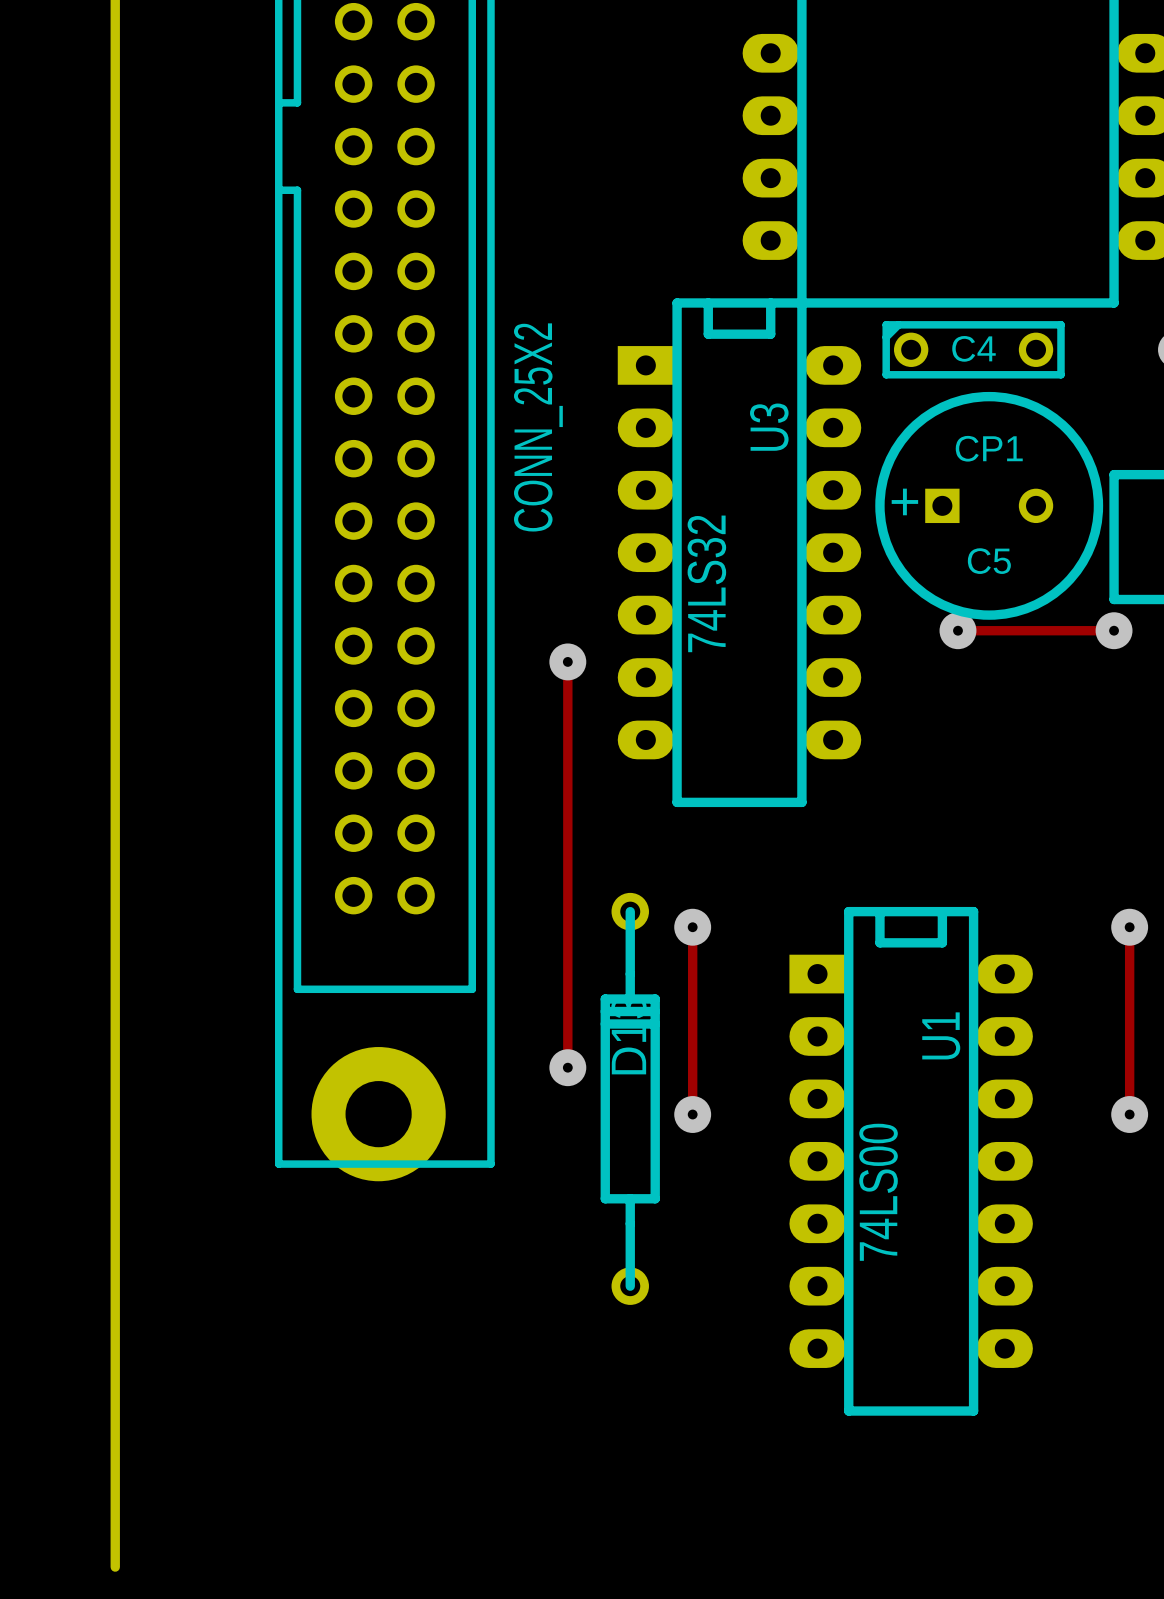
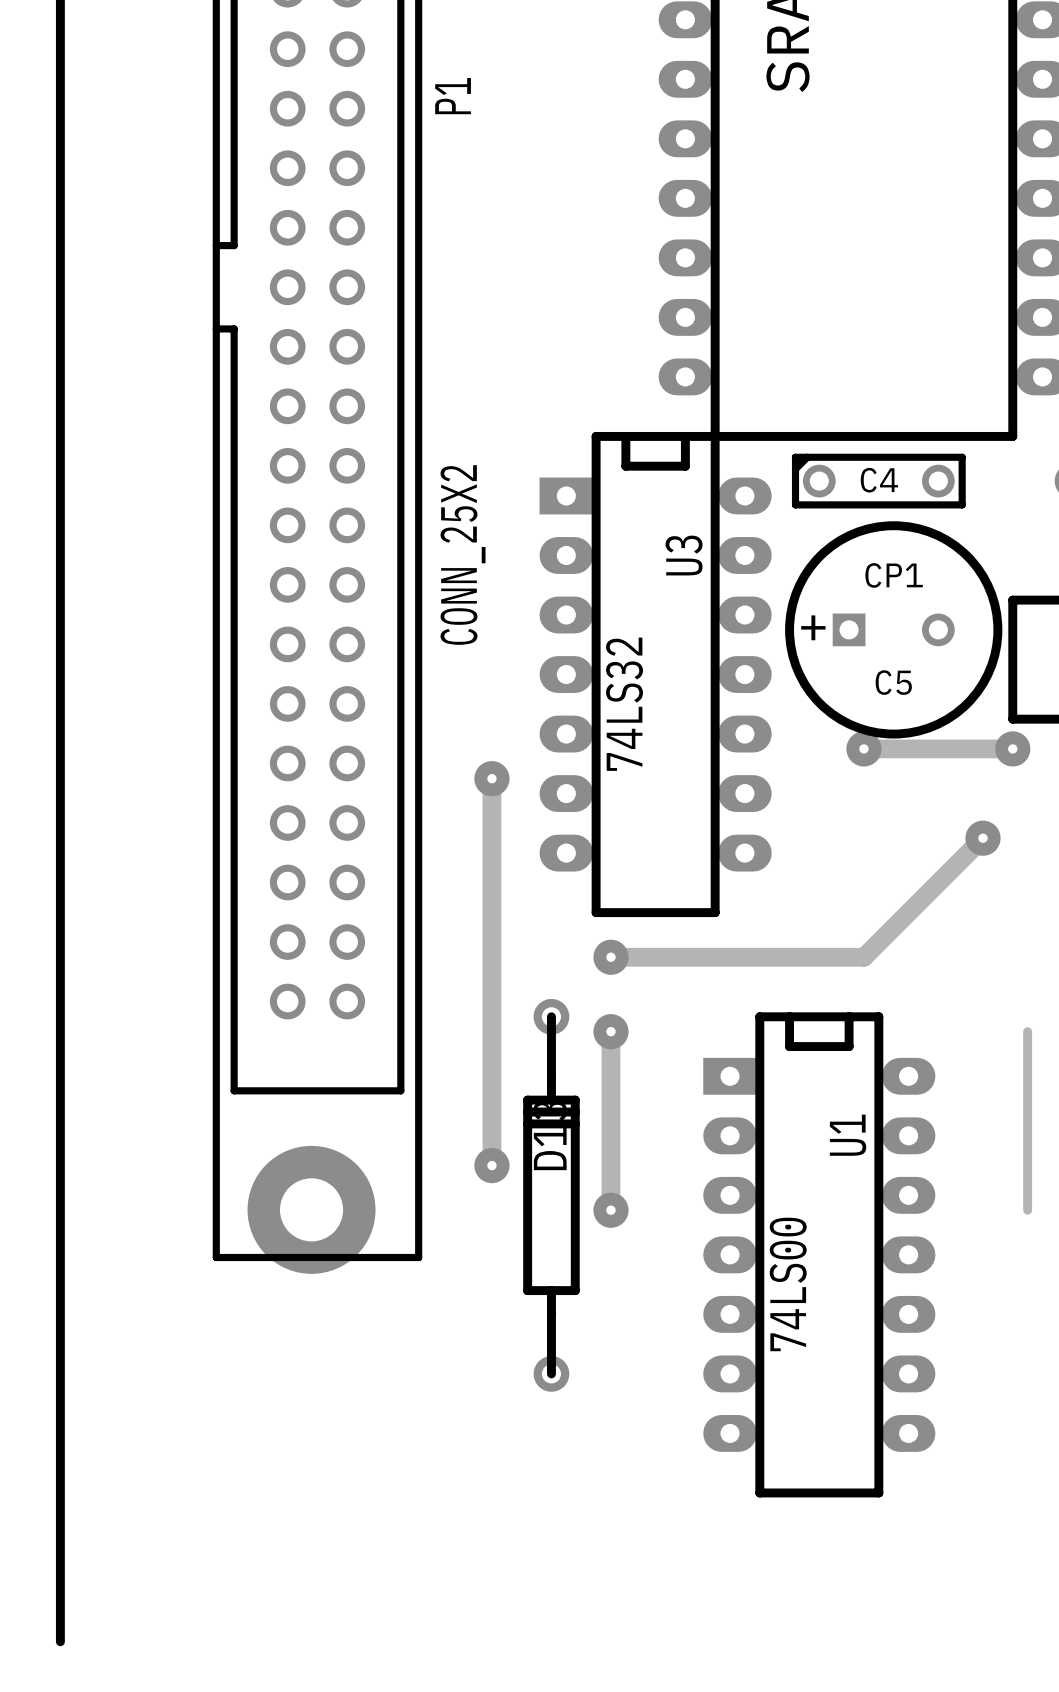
track width: thin (957, 630) (1114, 630) -> thick (863, 748) (1012, 748)
track width: thin (567, 661) (567, 1052) -> thick (491, 778) (491, 1150)
track: none -> (983, 838) (863, 957) (610, 957)
via: none -> (983, 838)
via: none -> (610, 957)
track width: thin (692, 927) (692, 1114) -> thick (610, 1031) (610, 1210)
via: (1129, 927) -> none
via: (1129, 1114) -> none

